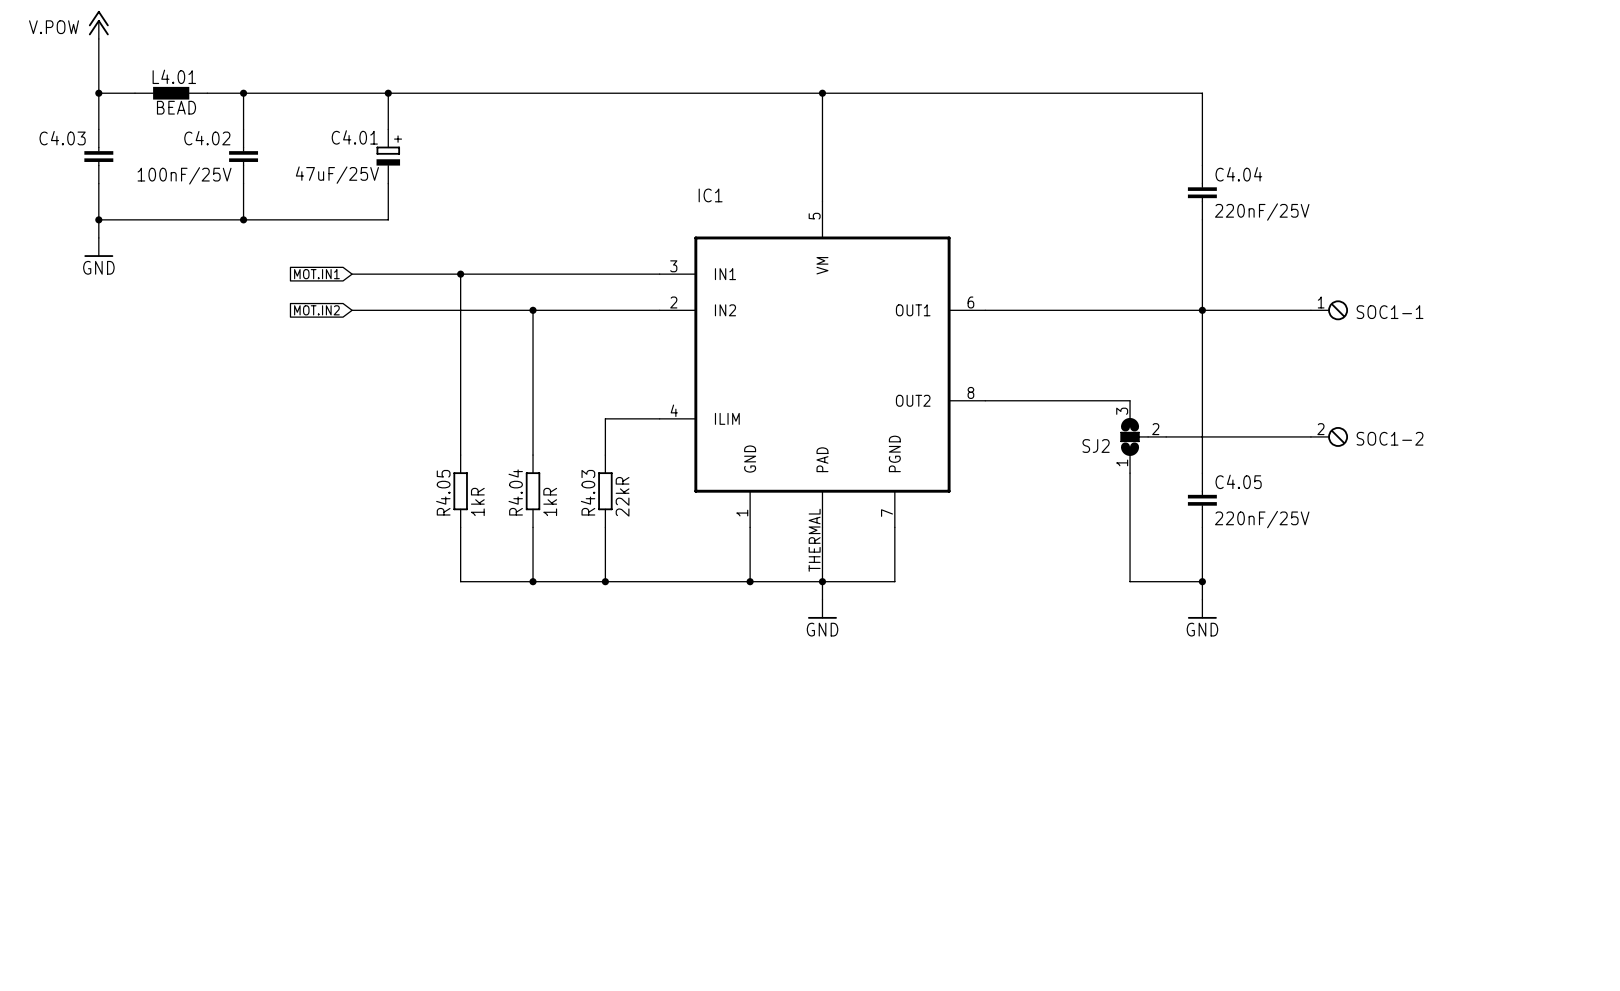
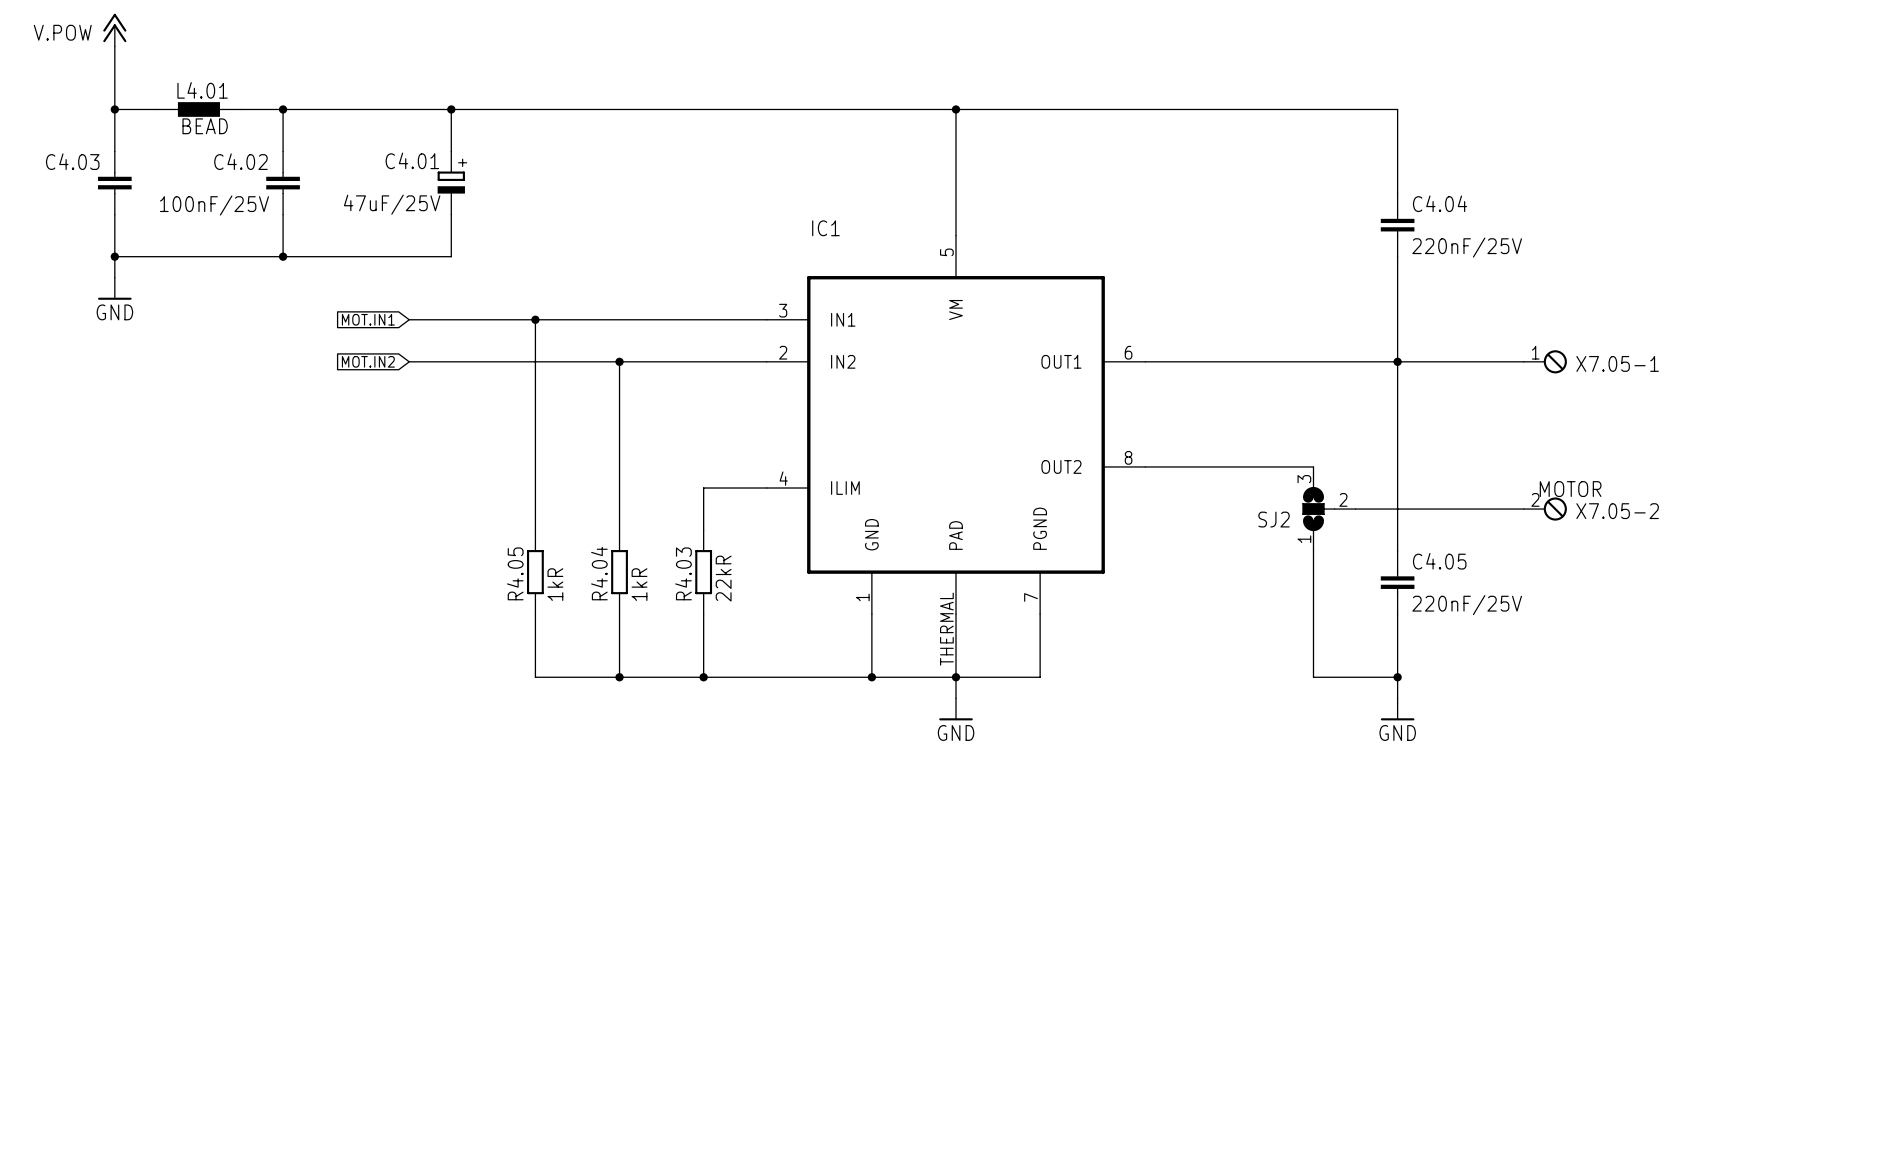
SOC1-1 name: SOC1-1 (1390, 312) -> X7.05-1 (1617, 363)
SOC1-2 value: none -> MOTOR (1570, 489)
SOC1-2 name: SOC1-2 (1390, 438) -> X7.05-2 (1617, 511)

